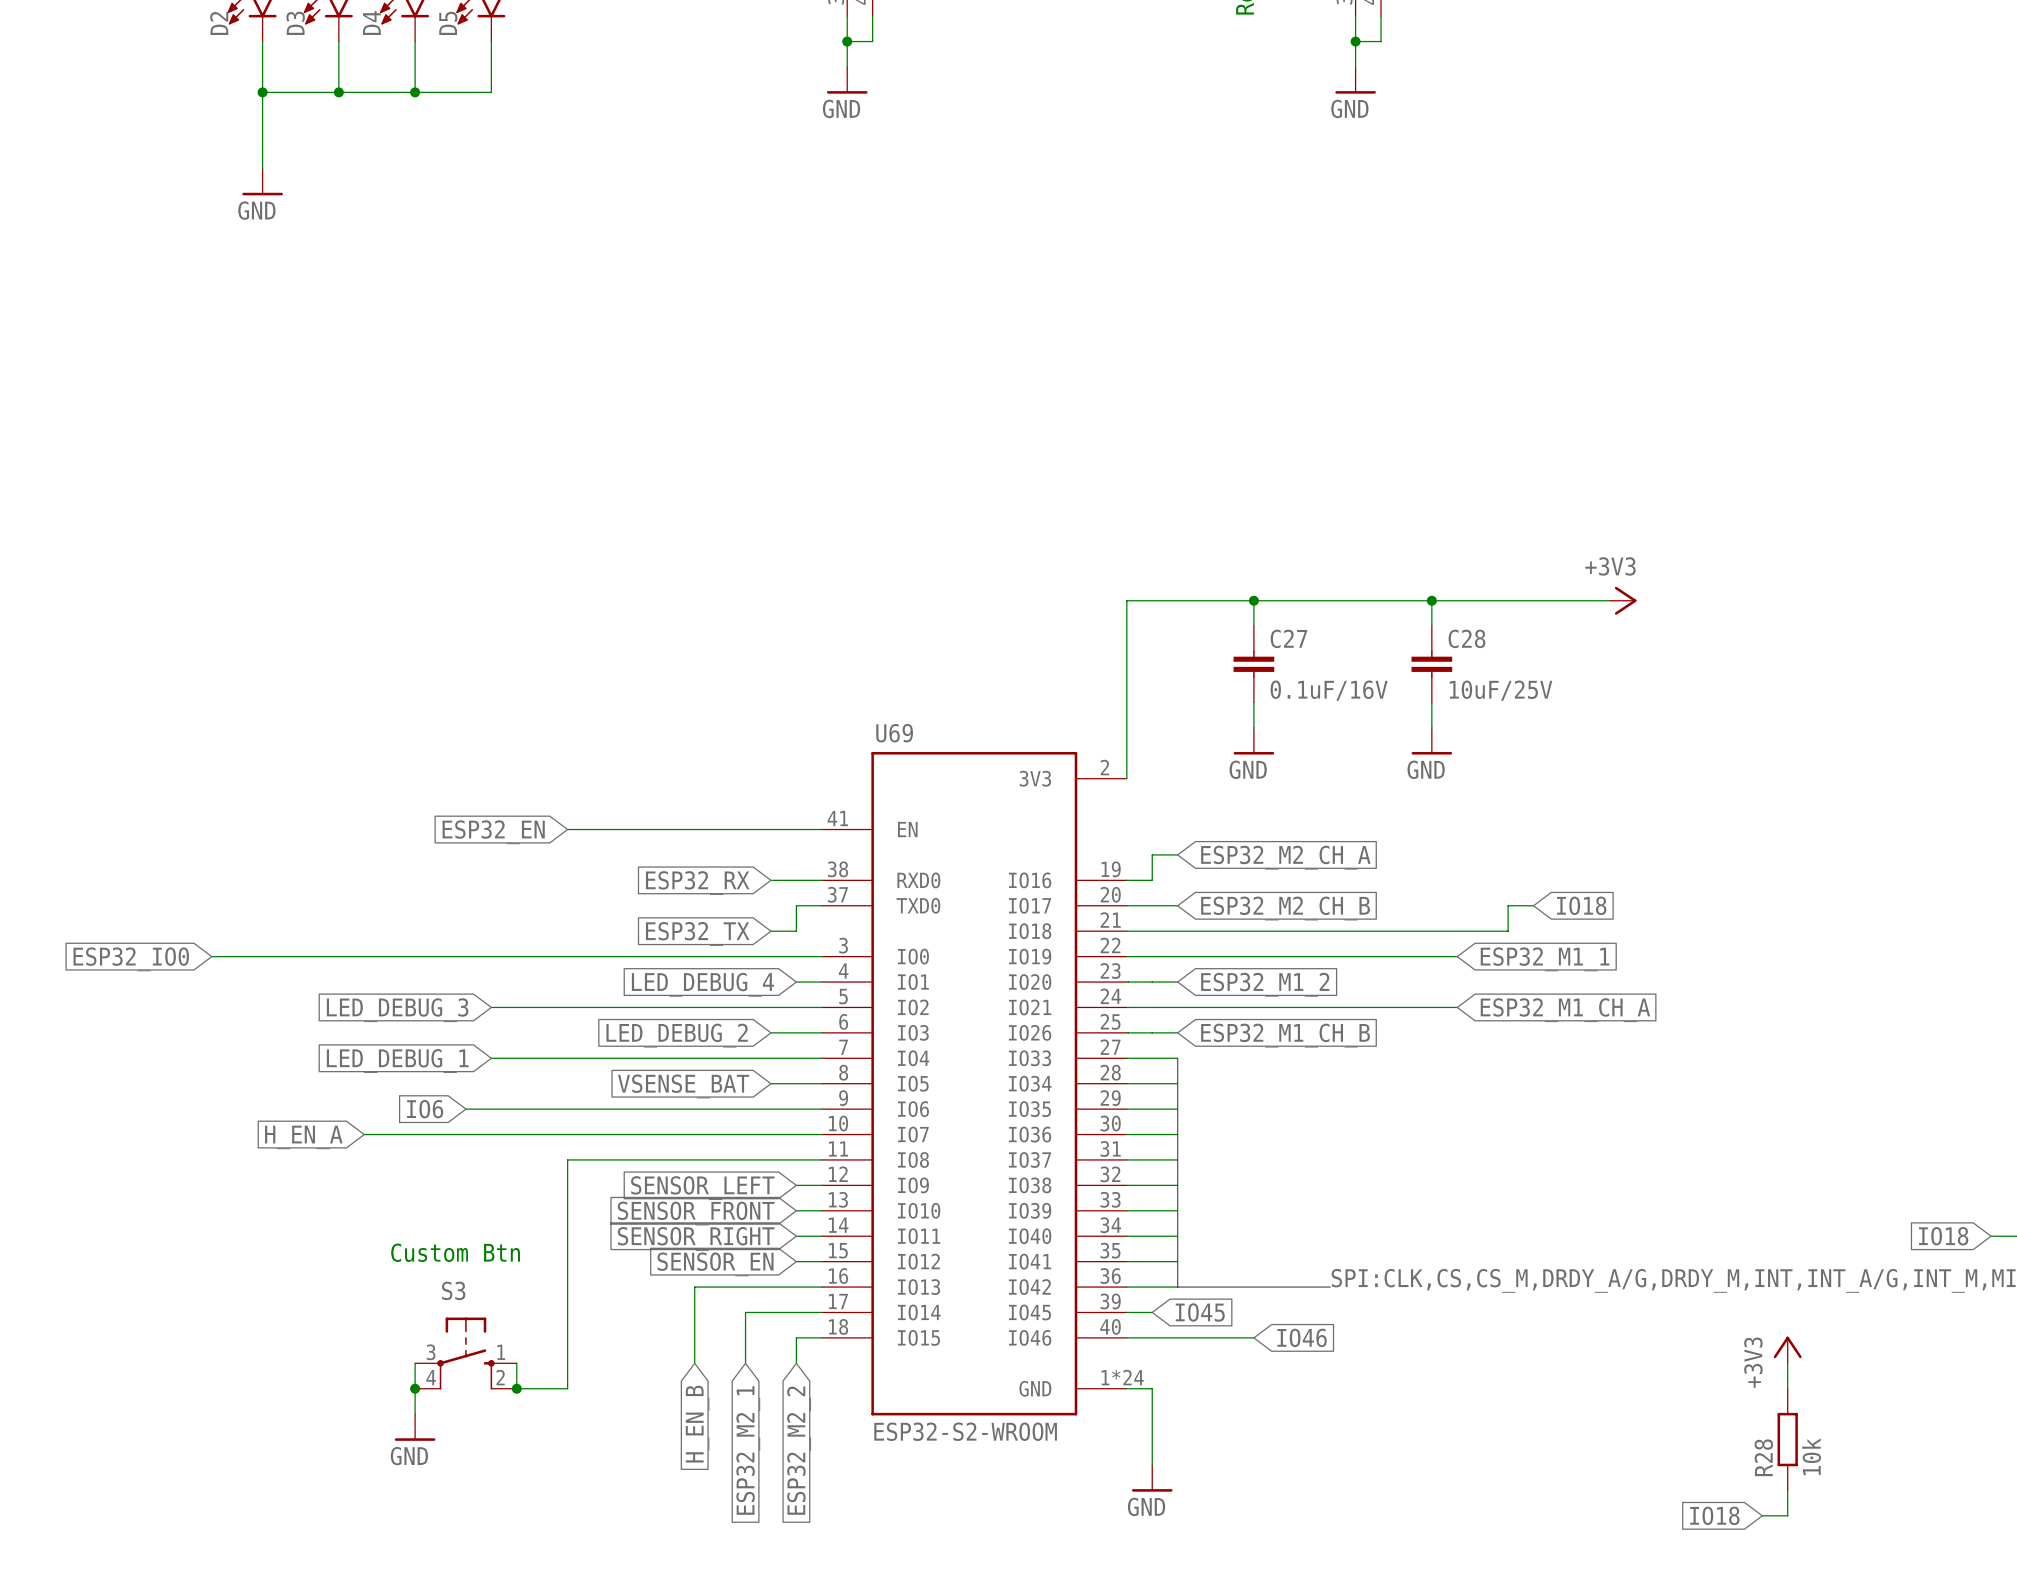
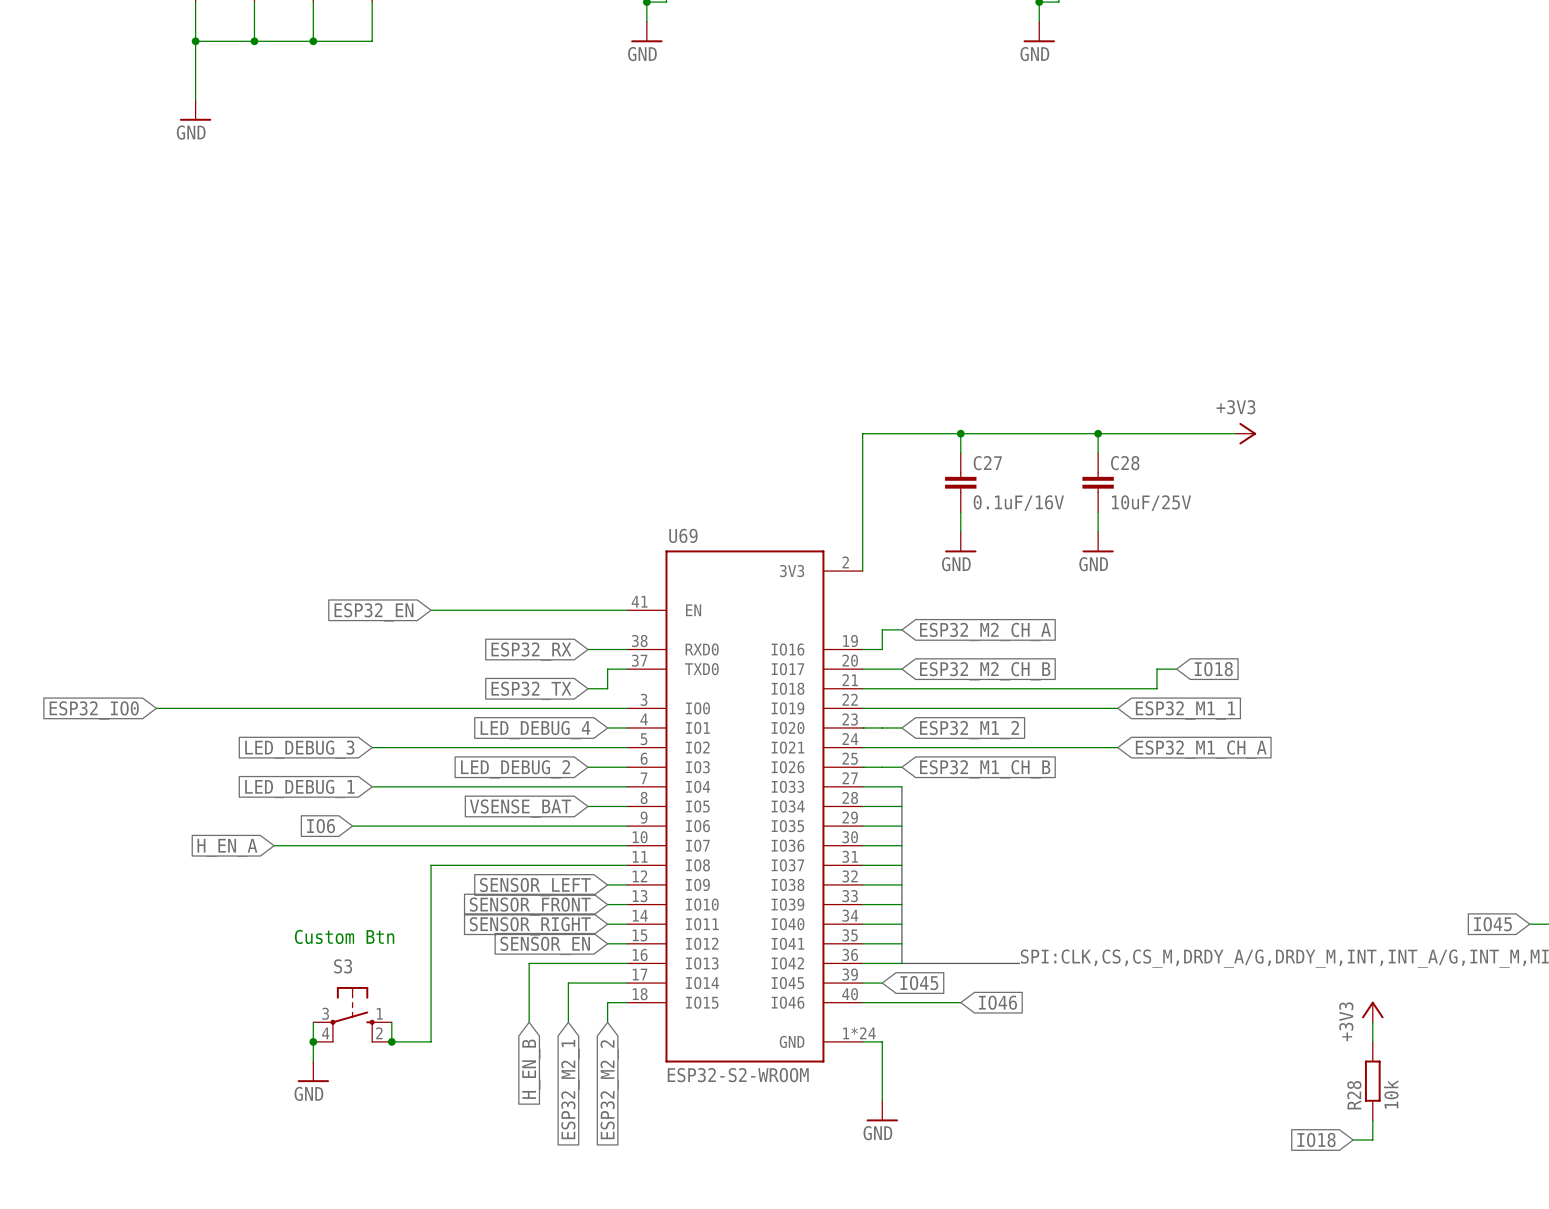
global label: IO18 (1943, 1236) -> IO45 (1493, 924)

